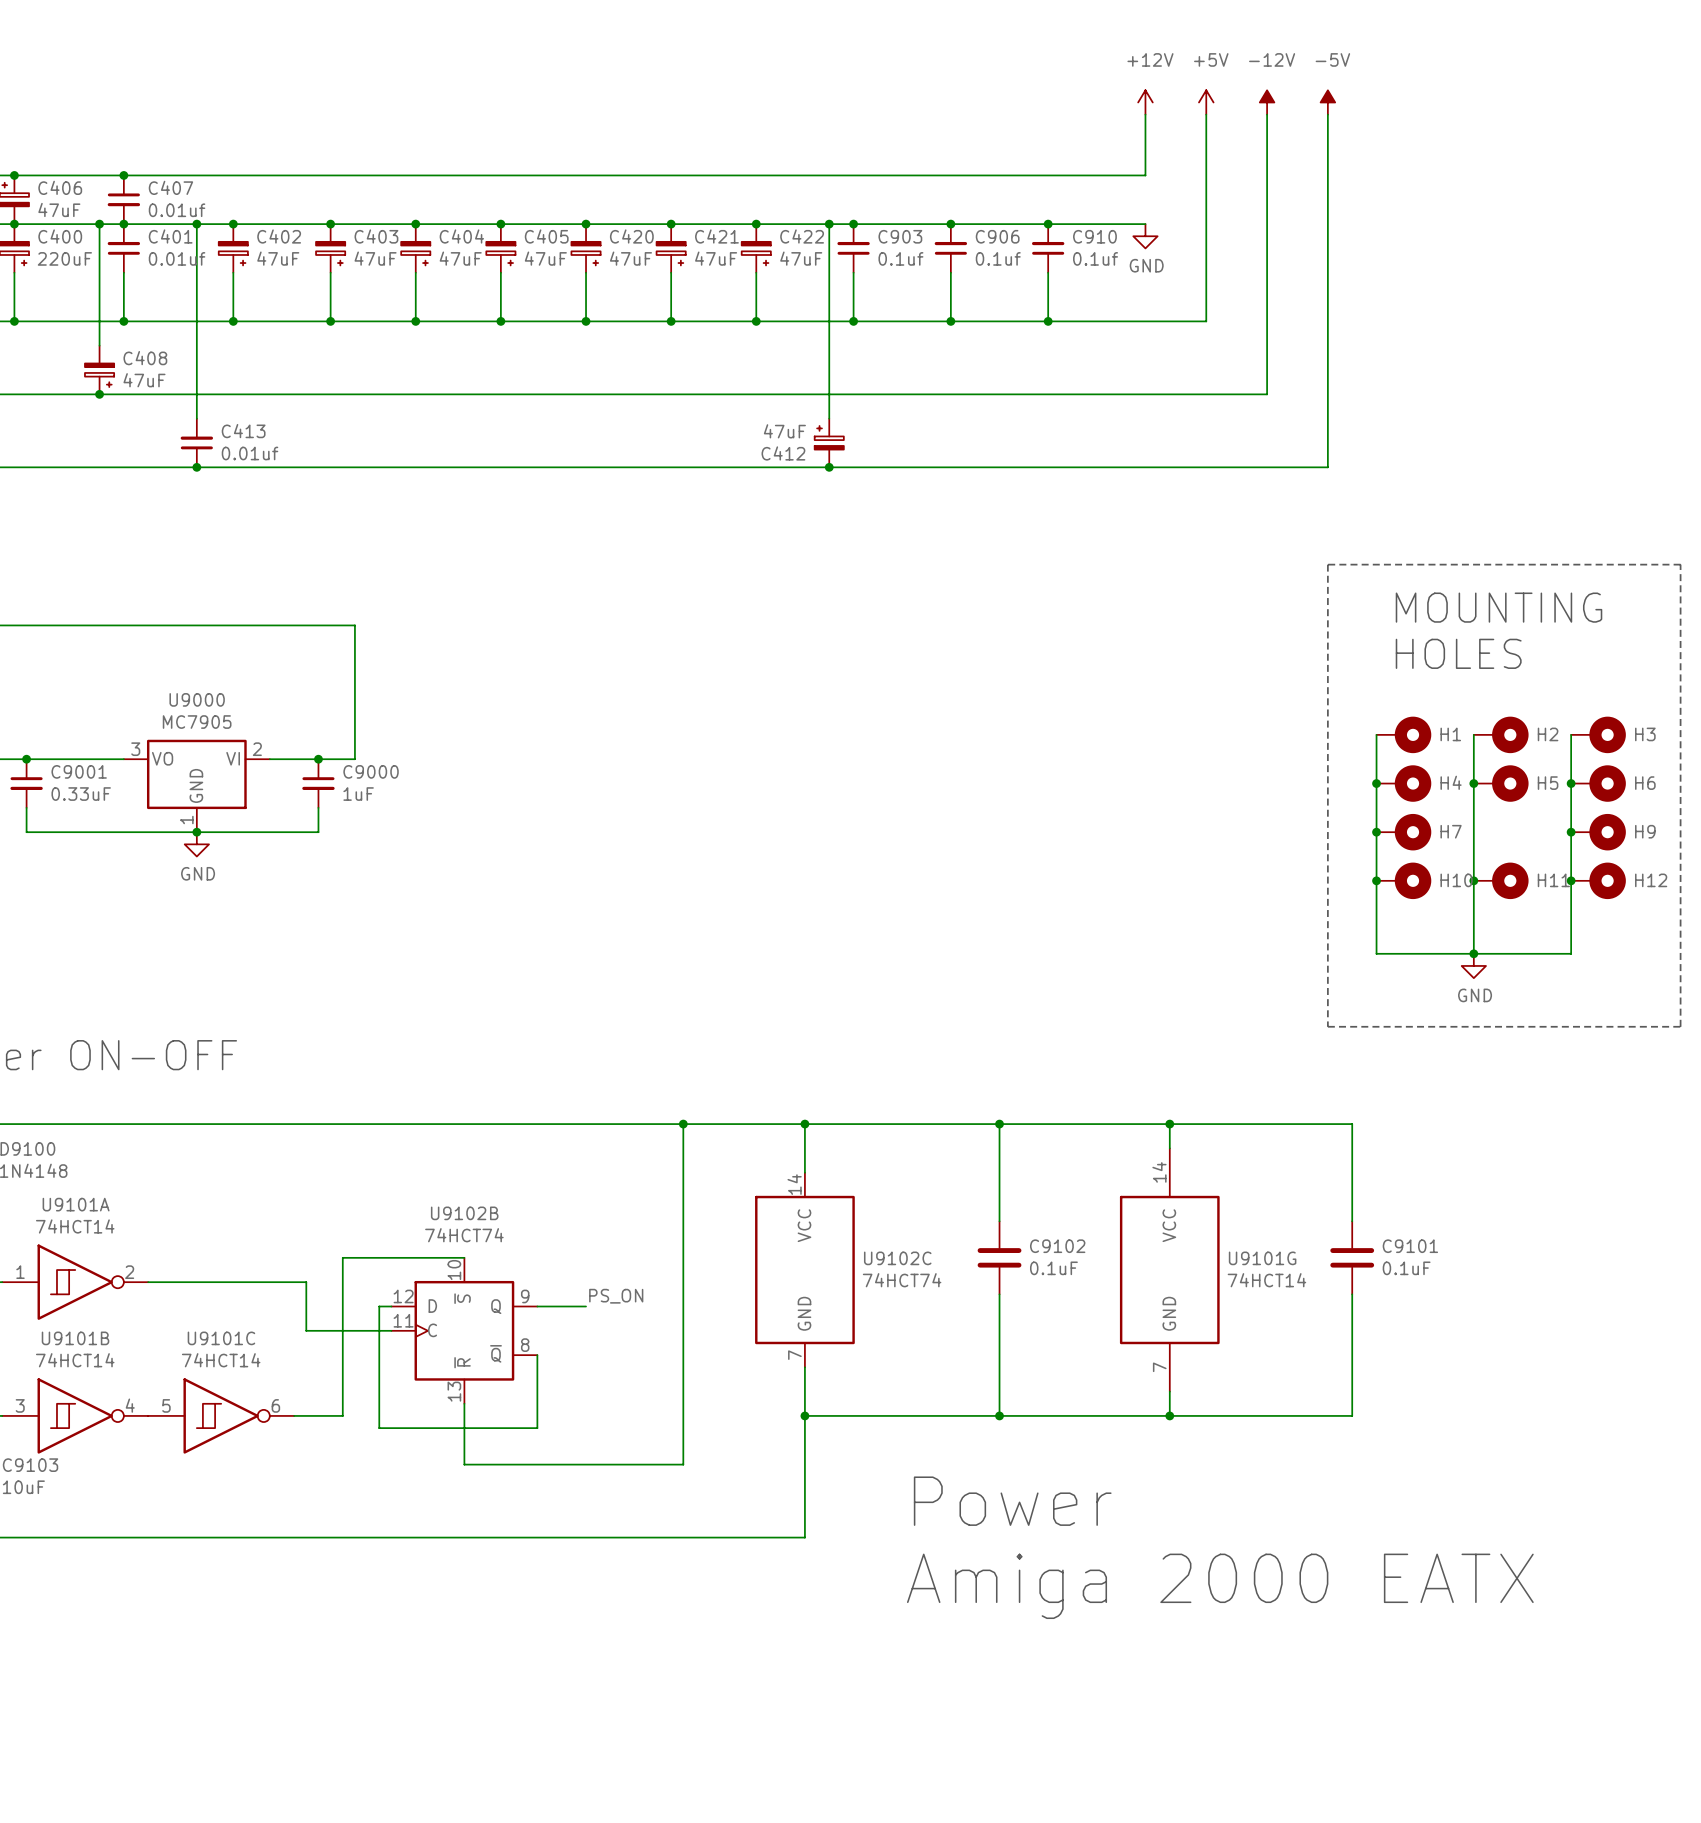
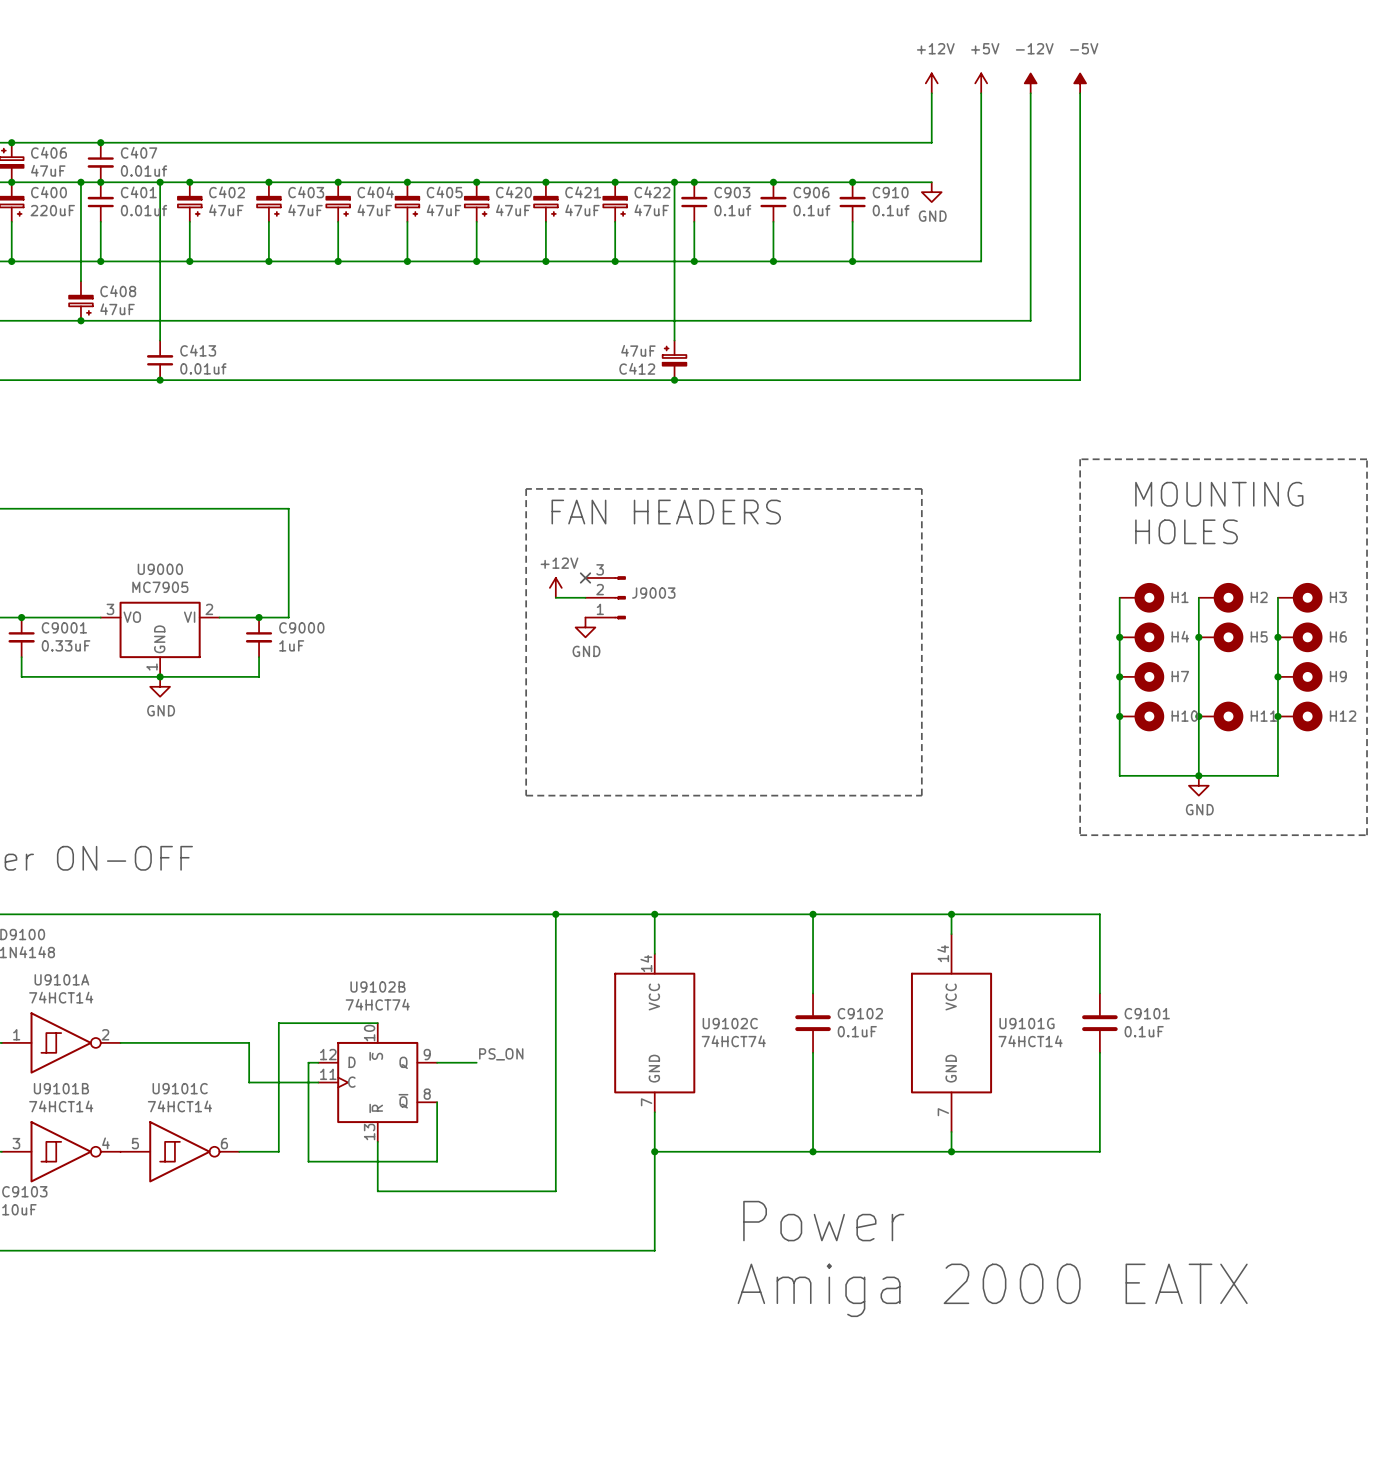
line: none -> (526, 488) (526, 795) (921, 795) (921, 488) (526, 488)
text: none -> FAN HEADERS (666, 512)
no-connect mark: none -> (585, 577)
power symbol: none -> +12V (555, 587)
wire: none -> (555, 597) (585, 597)
J9003: none -> (605, 597)
power symbol: none -> GND (585, 627)

